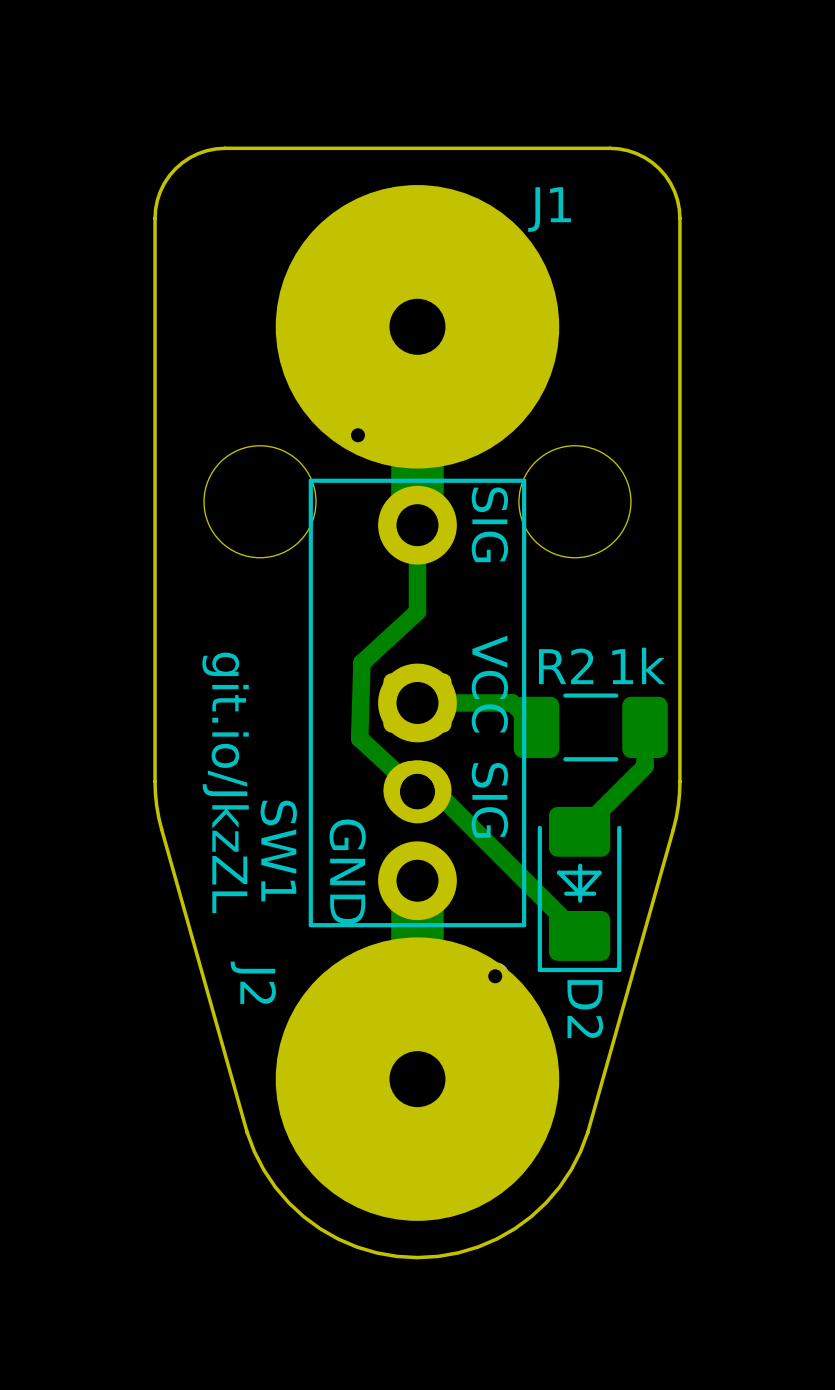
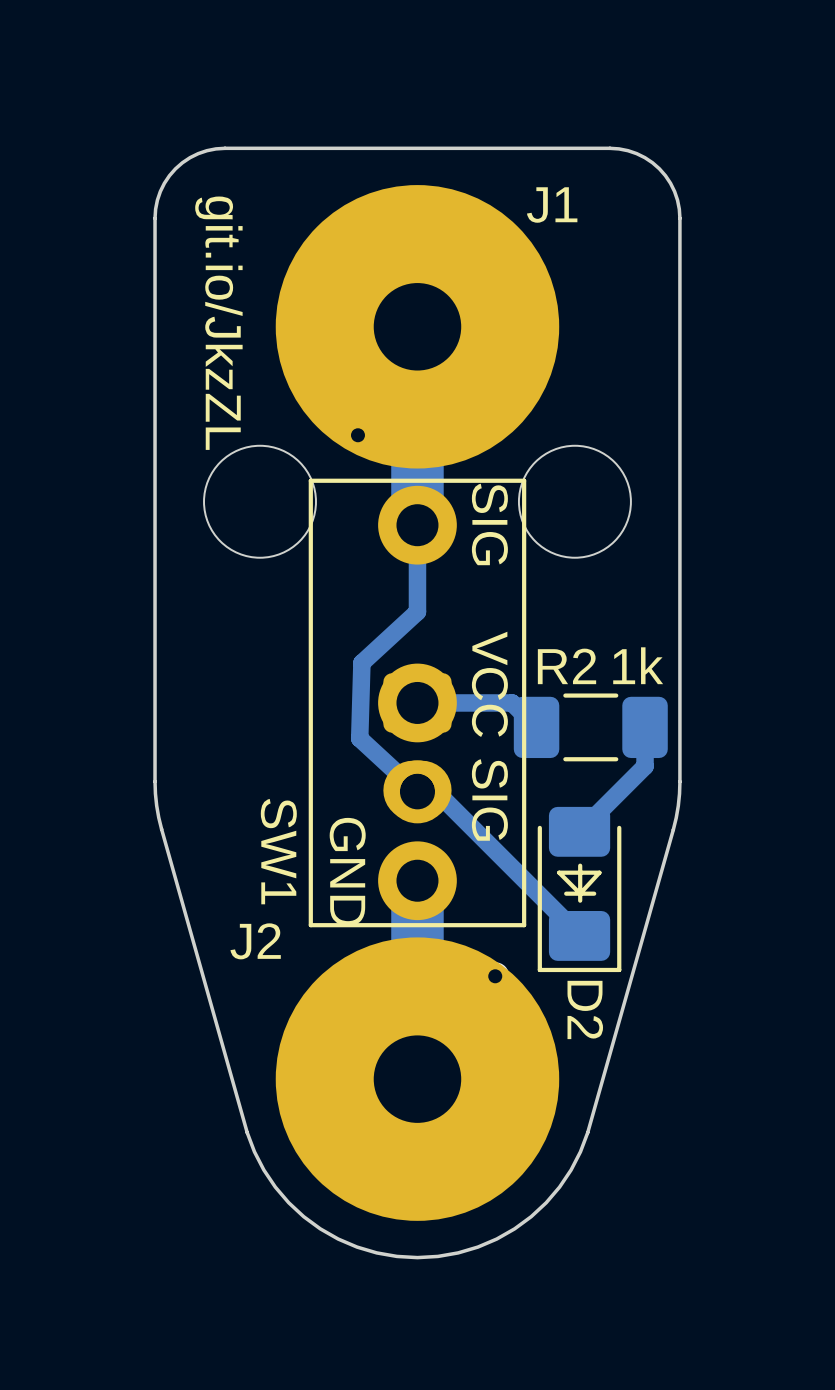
part footprint: [275, 185, 560, 469] -> [275, 185, 560, 469]
text position: git.io/JkzZL (225, 782) -> git.io/JkzZL (218, 323)
part footprint: [275, 937, 560, 1221] -> [275, 937, 560, 1221]
text rotation: 0° (253, 982) -> 90° counterclockwise (255, 941)

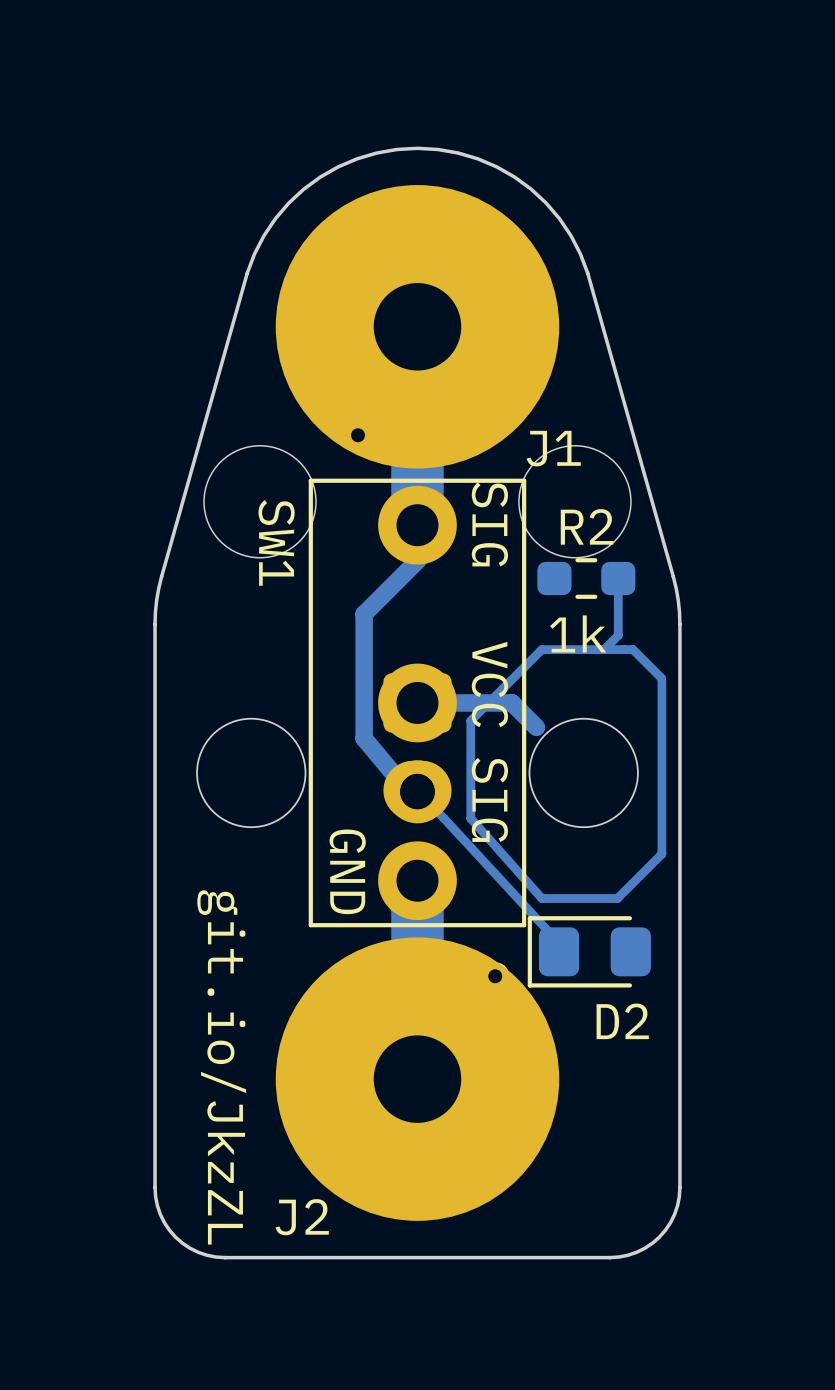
text position: J1 (552, 205) -> J1 (553, 448)
text position: git.io/JkzZL (218, 323) -> git.io/JkzZL (221, 1067)
track: (417, 560) (417, 611) (361, 662) (359, 738) (417, 791) -> (417, 560) (364, 614) (364, 738) (408, 791) (417, 791) (444, 818) (550, 934)
track: none -> (618, 578) (618, 635) (604, 649)
board edge: (679, 624) (679, 209) (670, 183) (659, 168) (636, 153) (609, 148) (225, 148) (198, 153) (175, 168) (160, 191) (155, 218) (155, 624) -> (679, 624) (678, 600) (673, 576) (587, 273) (571, 235) (546, 203) (514, 177) (496, 166) (458, 153) (417, 148) (396, 149) (357, 158) (320, 177) (288, 203) (263, 235) (247, 273) (161, 576) (156, 600) (155, 624)
text position: 1k (638, 665) -> 1k (578, 633)
track: none -> (661, 678) (633, 649) (541, 649) (470, 720) (470, 818) (541, 898) (617, 898) (661, 854) (661, 680)
R2 footprint: [513, 693, 668, 762] -> [537, 558, 636, 599]
round board edge: none -> [196, 717, 307, 829]
round board edge: none -> [528, 717, 639, 829]
track: (645, 727) (645, 766) (579, 831) -> none
board edge: (679, 781) (678, 805) (673, 829) (587, 1132) (571, 1170) (546, 1202) (514, 1228) (477, 1247) (437, 1256) (417, 1257) (376, 1252) (338, 1239) (320, 1228) (288, 1202) (263, 1170) (247, 1132) (161, 829) (156, 805) (155, 781) -> (679, 781) (679, 1196) (670, 1222) (652, 1243) (628, 1255) (609, 1257) (225, 1257) (198, 1252) (175, 1237) (160, 1214) (155, 1187) (155, 781)
track: (426, 791) (436, 791) (579, 935) -> none
D2 footprint: [537, 806, 622, 973] -> [527, 916, 651, 988]
SW1 name position: SW1 (278, 851) -> SW1 (276, 542)
line: (580, 865) (580, 900) -> none
line: (599, 872) (559, 872) (580, 893) (599, 872) -> none
line: (594, 893) (566, 893) -> none
text position: J2 (255, 941) -> J2 (302, 1217)

